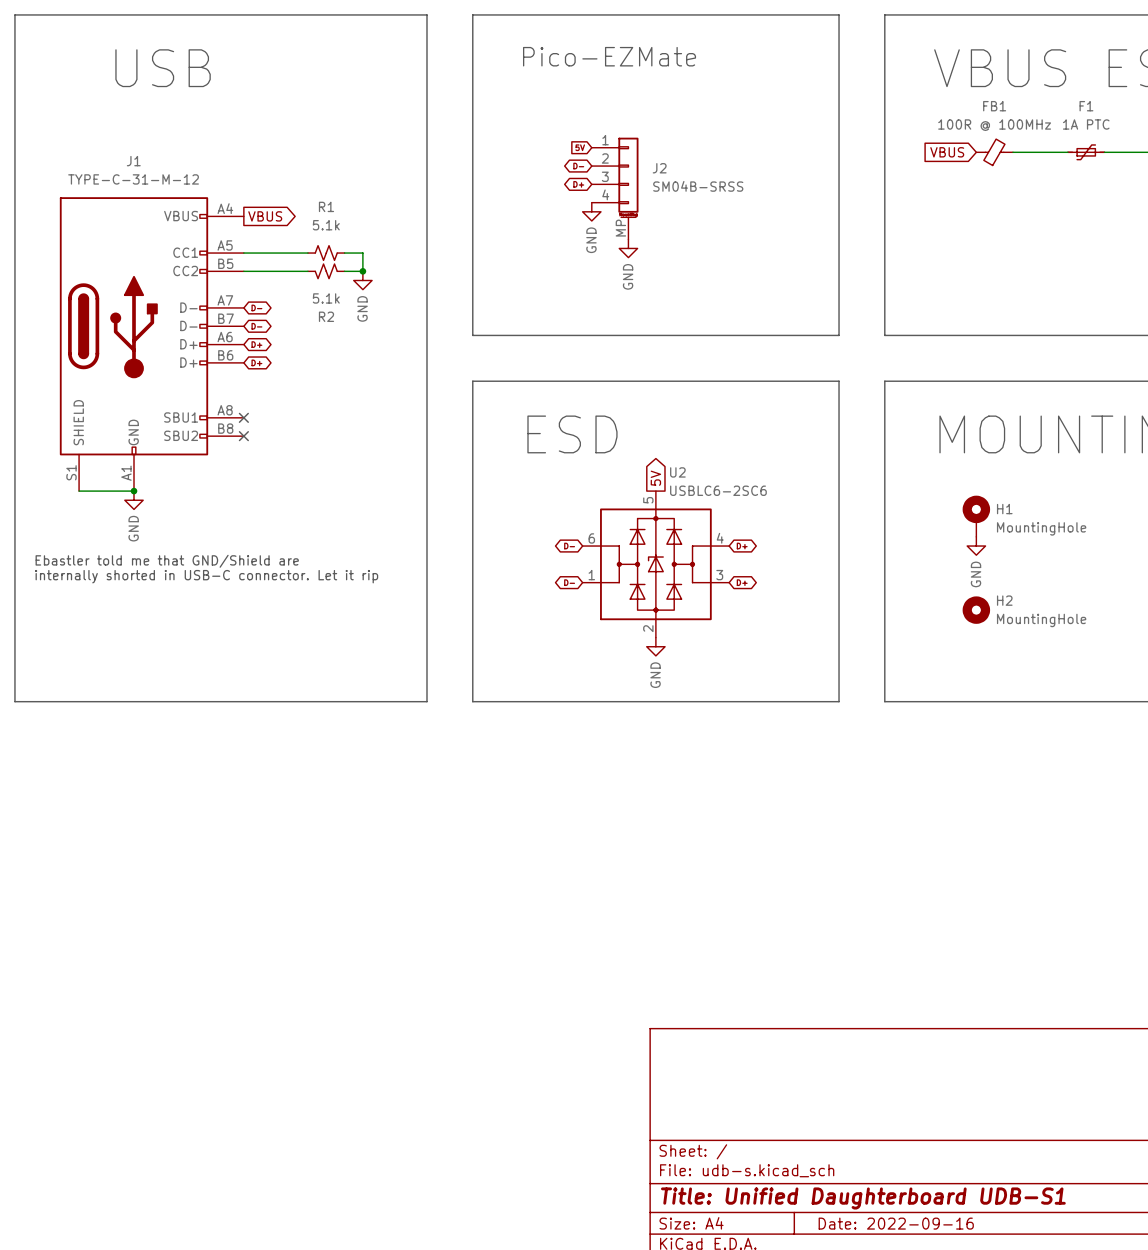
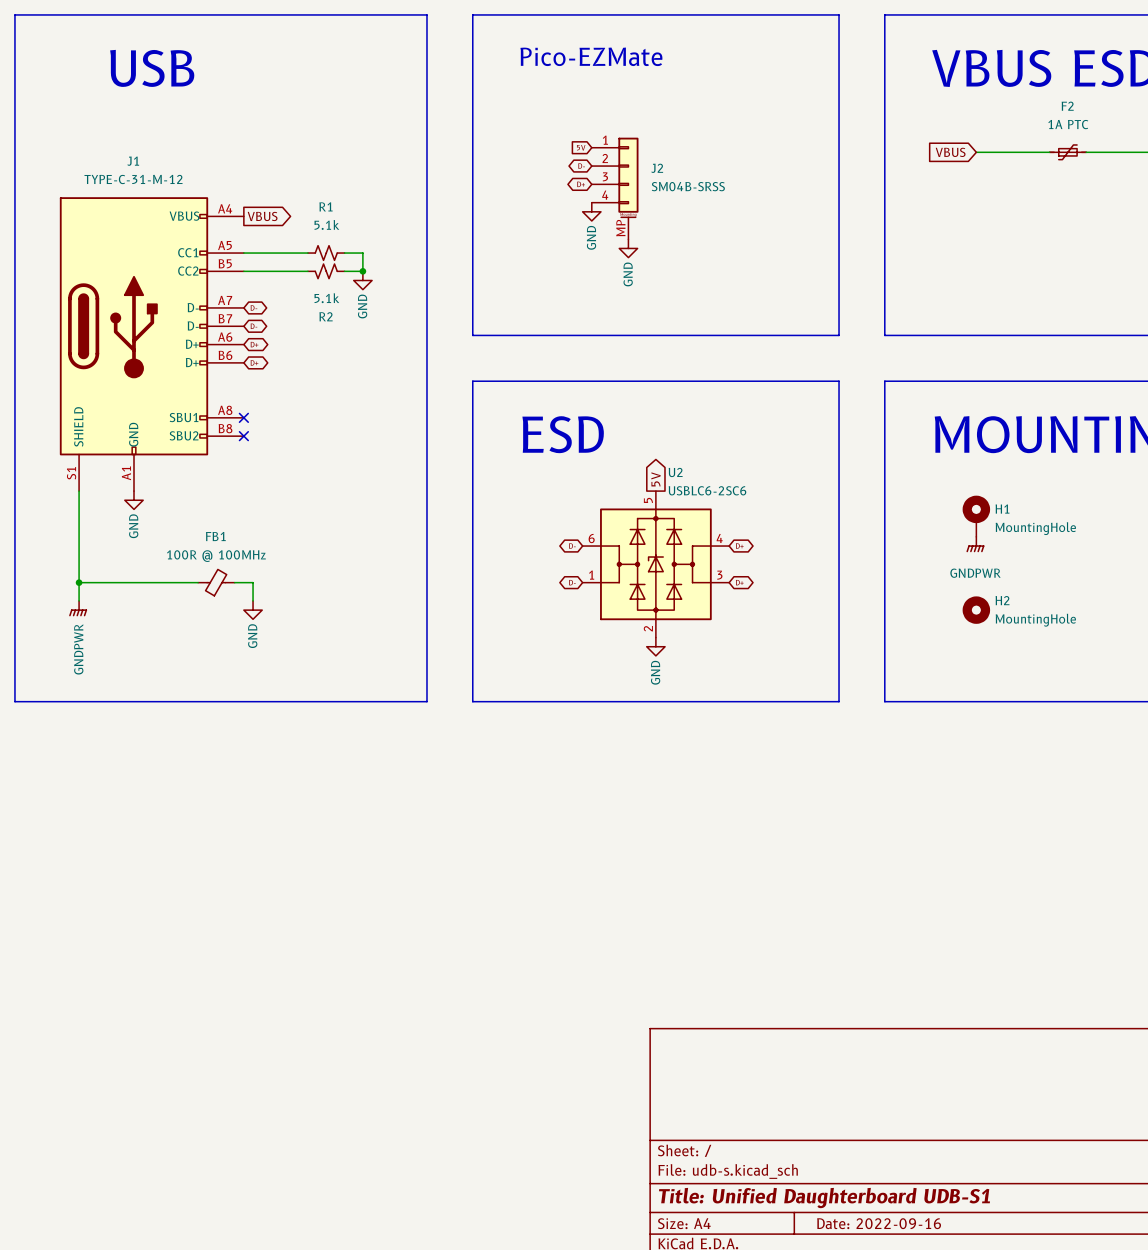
FB1 position: (994, 152) -> (216, 582)
F2: none -> 1A PTC (1067, 152)
F1: 1A PTC (1086, 152) -> none
wire: (79, 491) (134, 491) -> (79, 491) (79, 600)
junction: (134, 491) -> none
power symbol: GND (976, 546) -> GNDPWR (975, 544)
text: Ebastler told me that GND/Shield are (167, 561) -> none
text: internally shorted in USB-C connector. Let it rip (206, 576) -> none
wire: none -> (79, 582) (198, 582)
junction: none -> (79, 582)
wire: none -> (234, 582) (253, 582) (253, 600)
power symbol: none -> GNDPWR (78, 608)
power symbol: none -> GND (253, 610)

